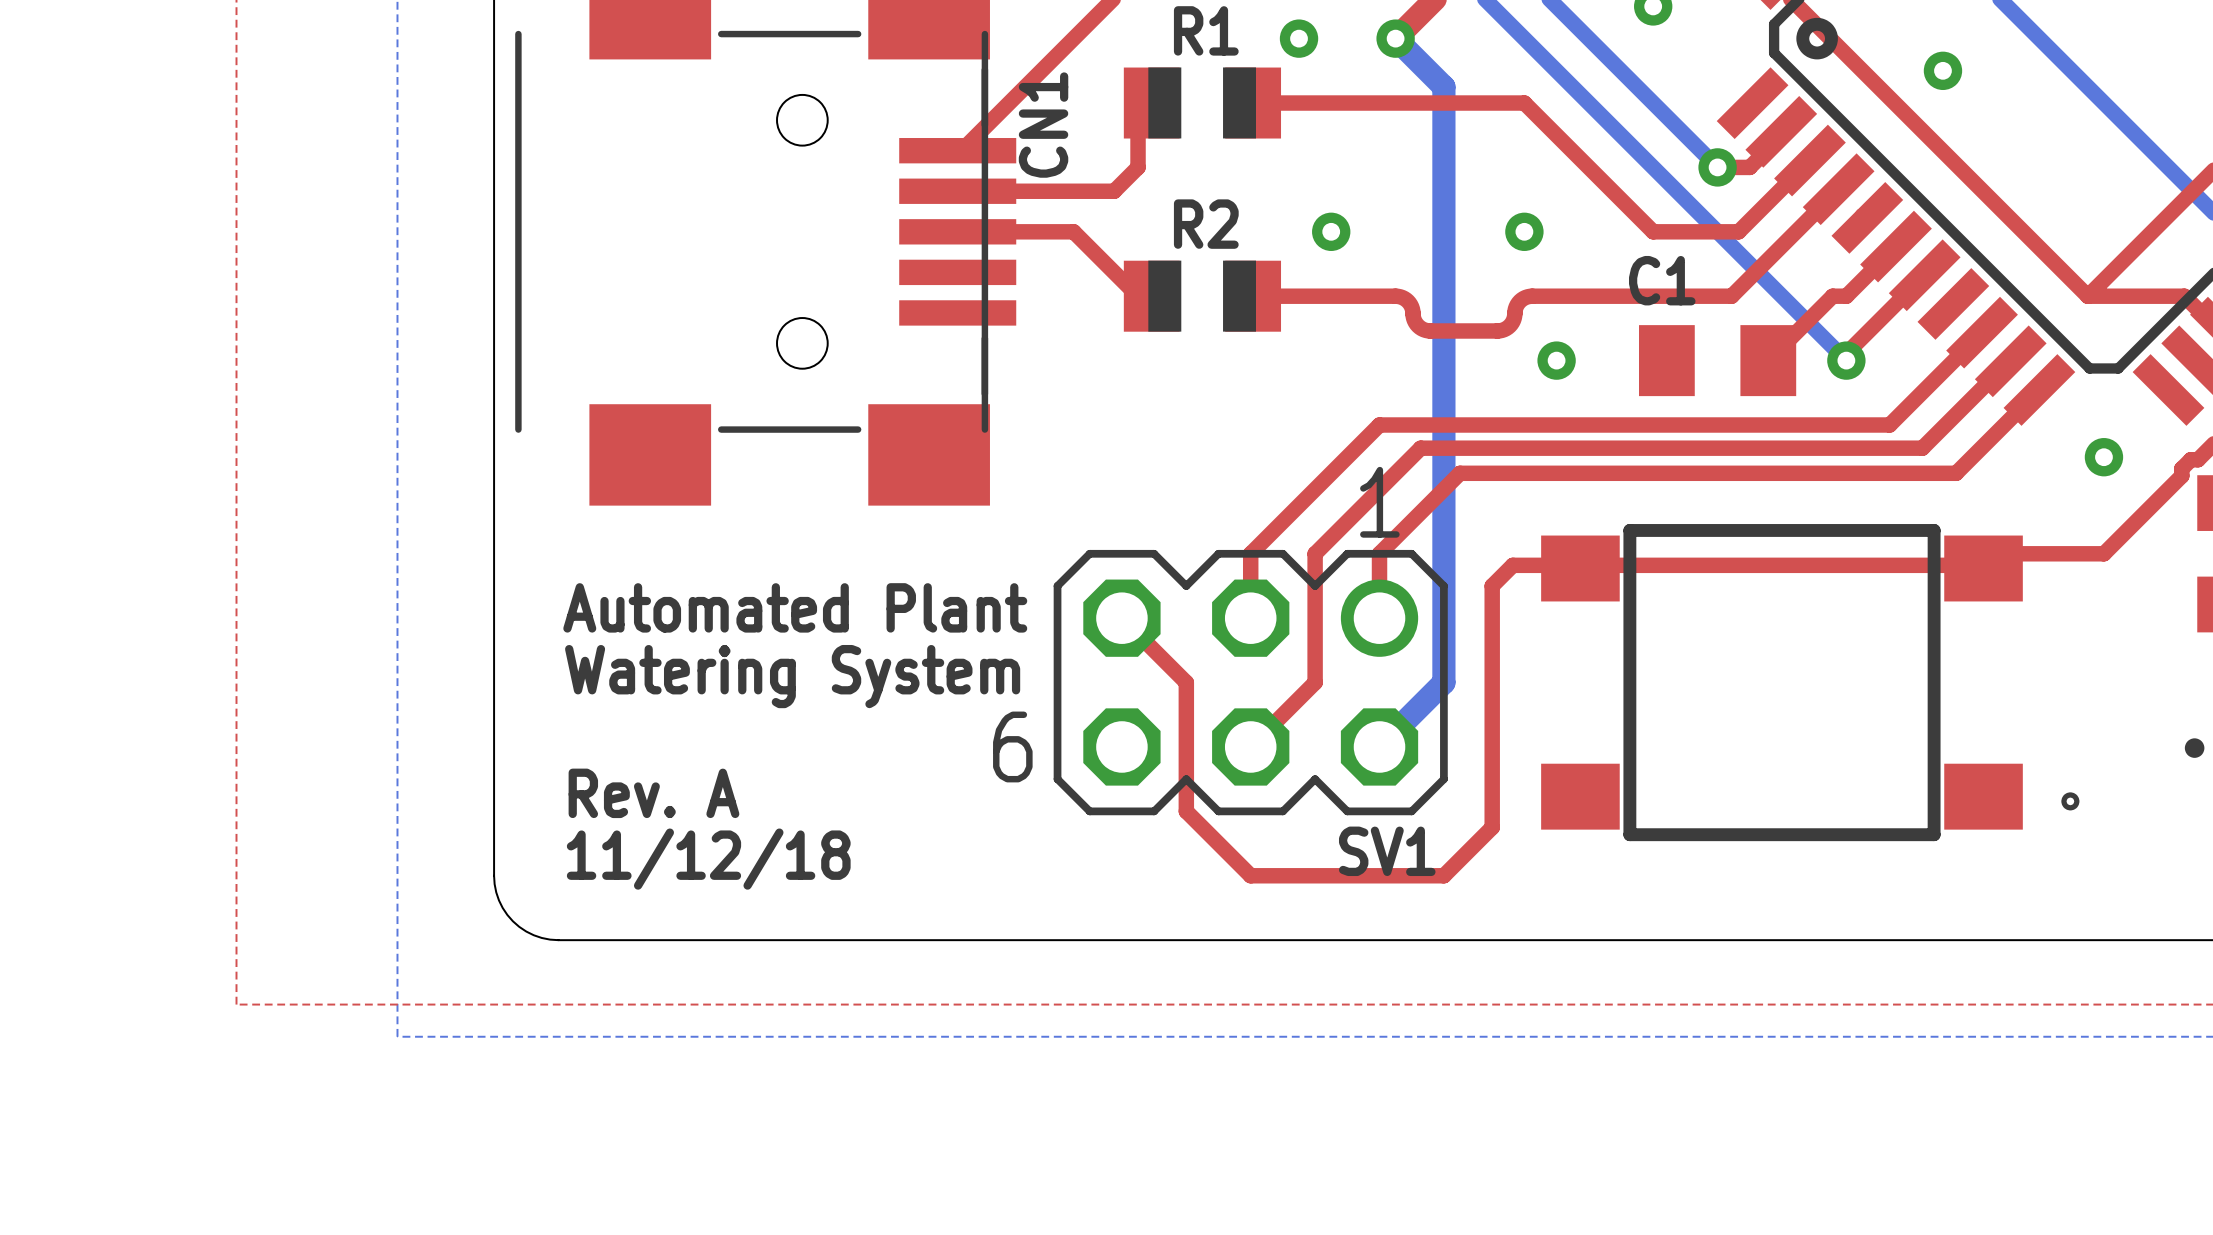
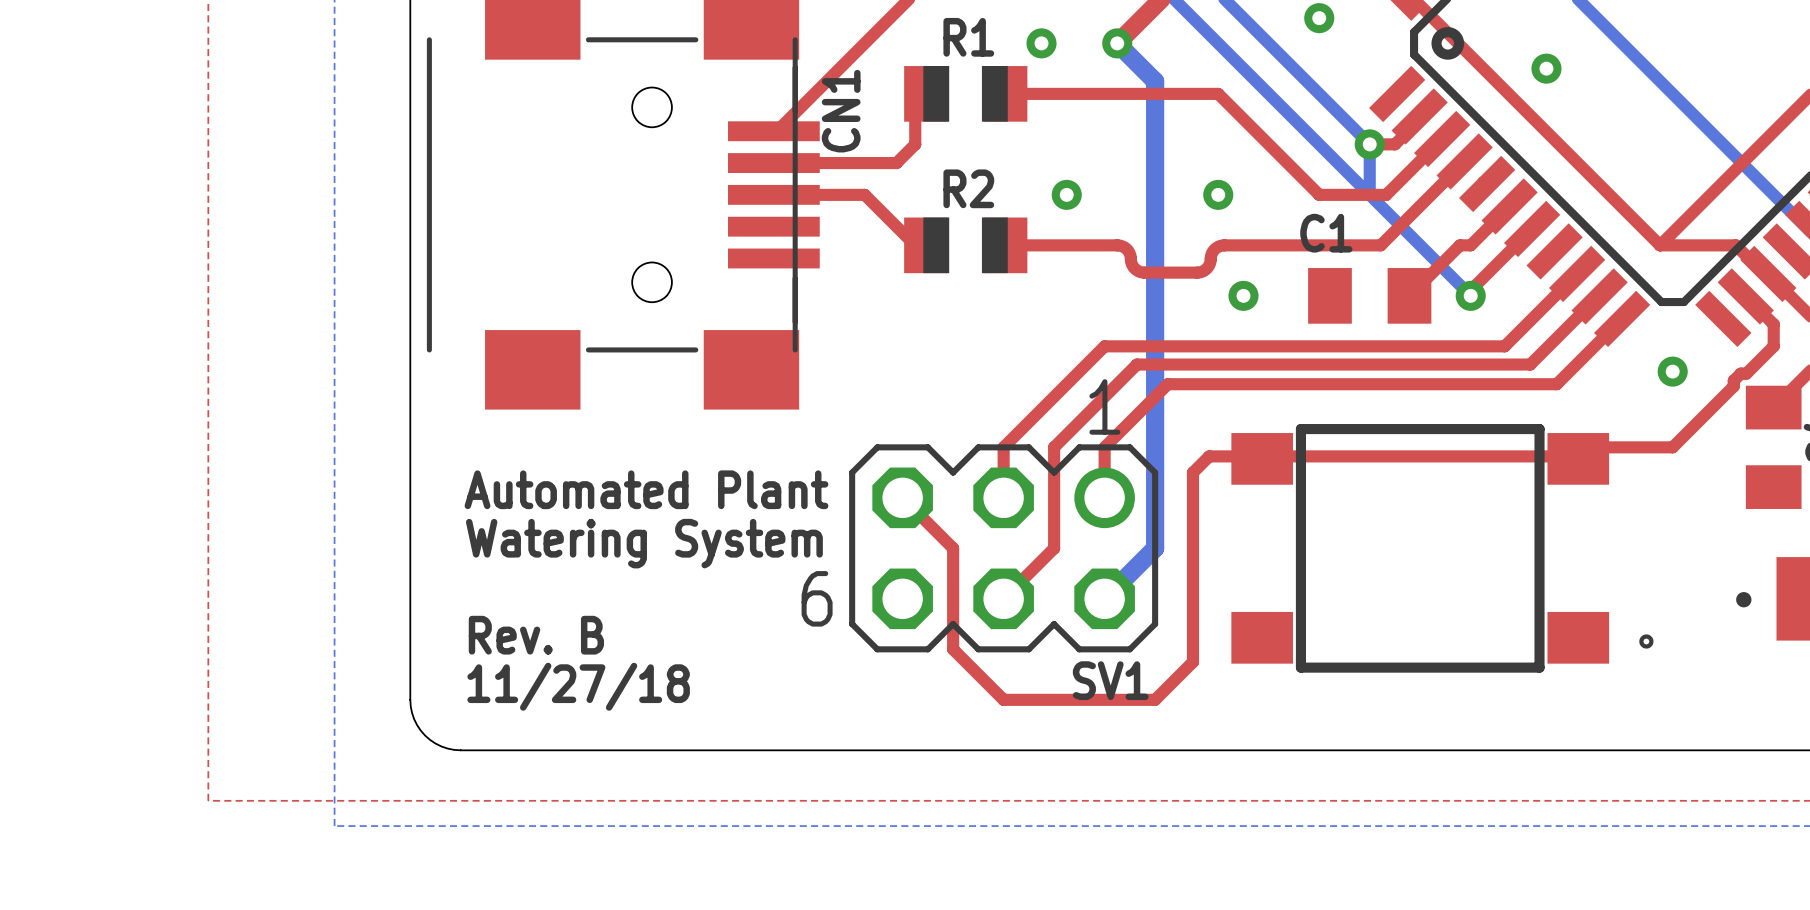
bottom track: none -> (1369, 144) (1369, 194)
text: Rev. A (653, 793) -> Rev. B (536, 635)
text: 11/12/18 (708, 859) -> 11/27/18 (578, 686)

